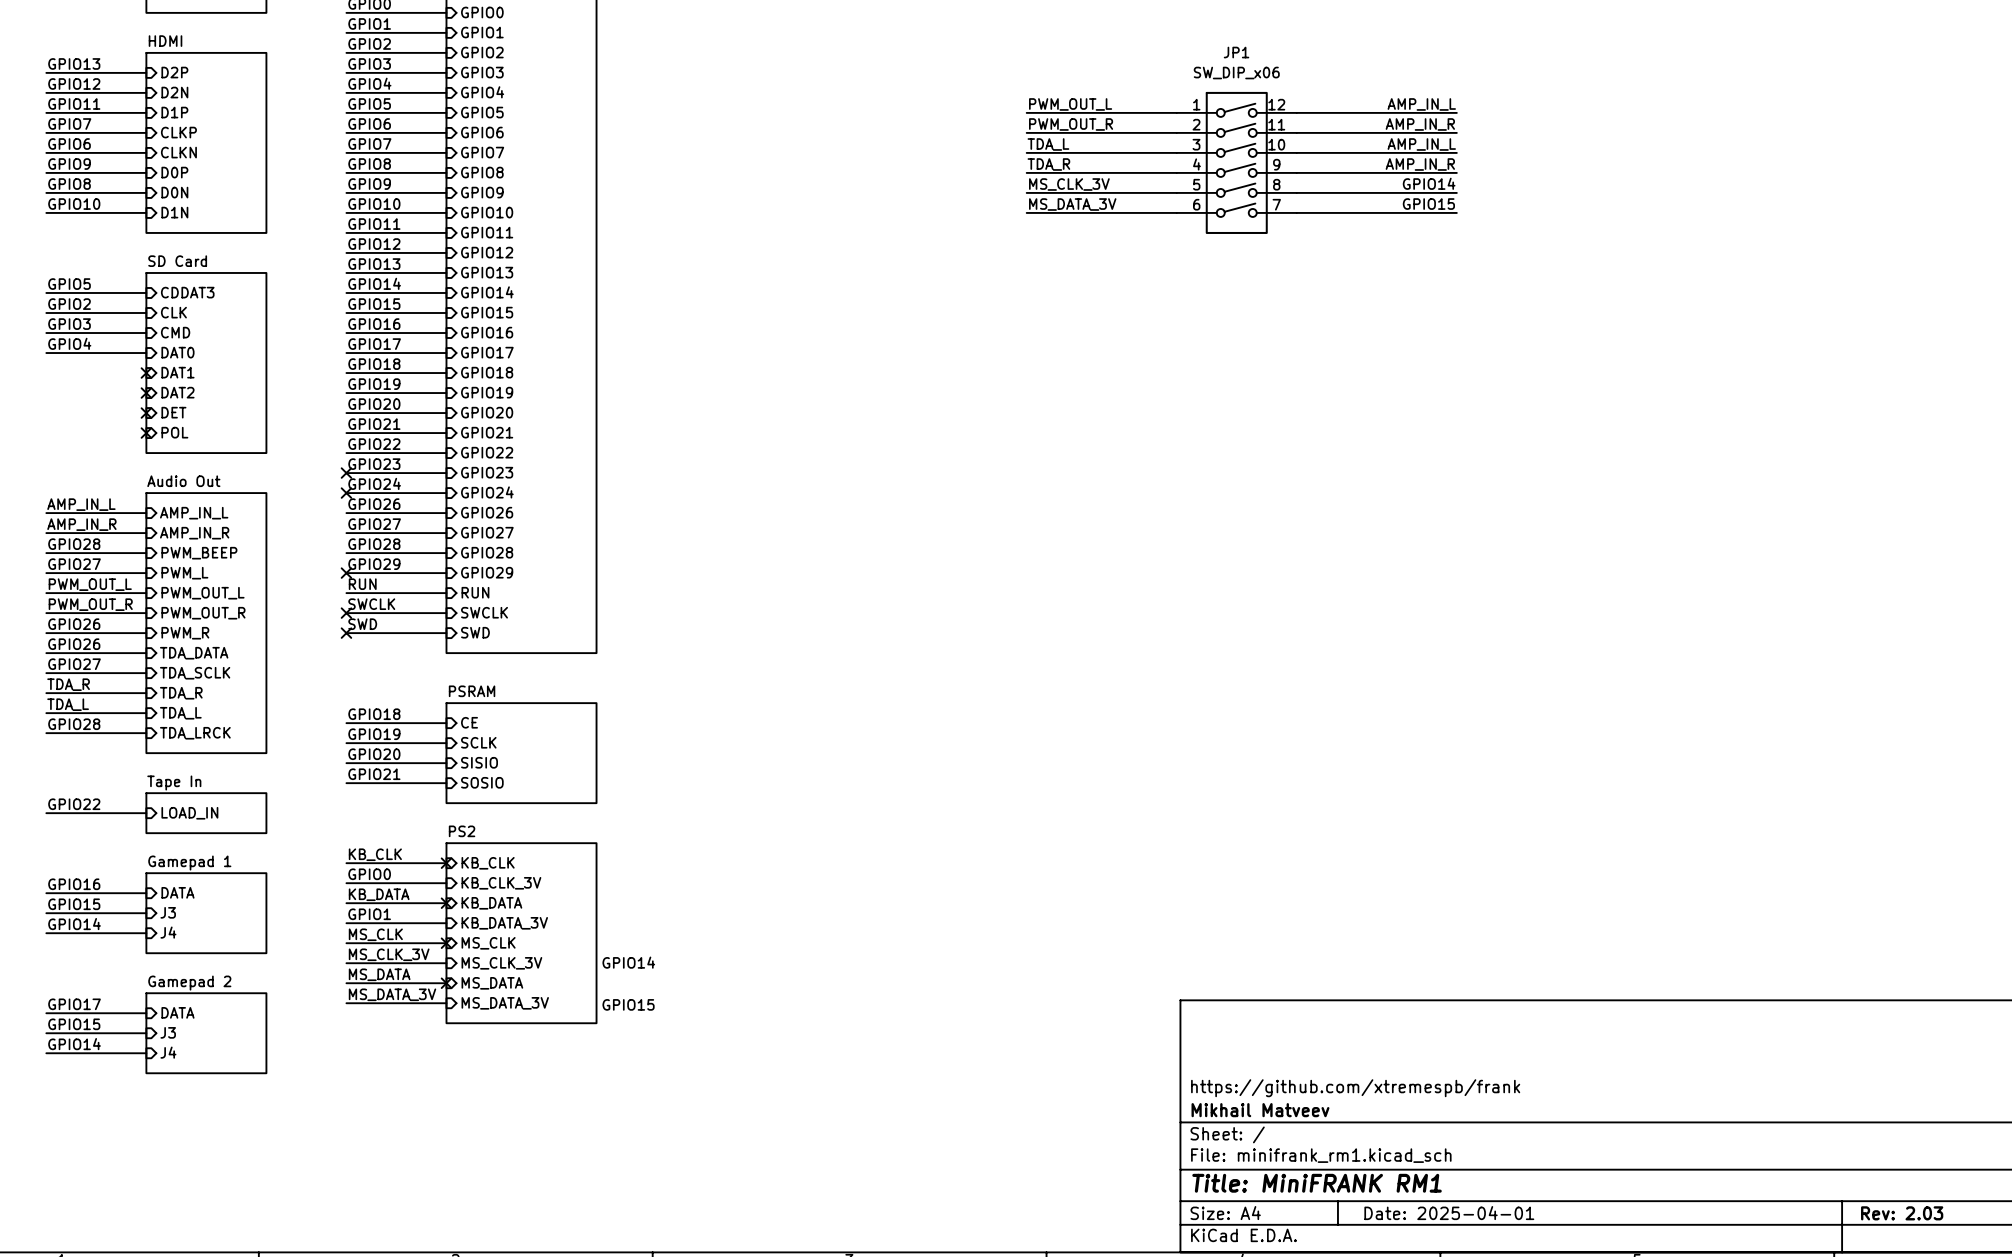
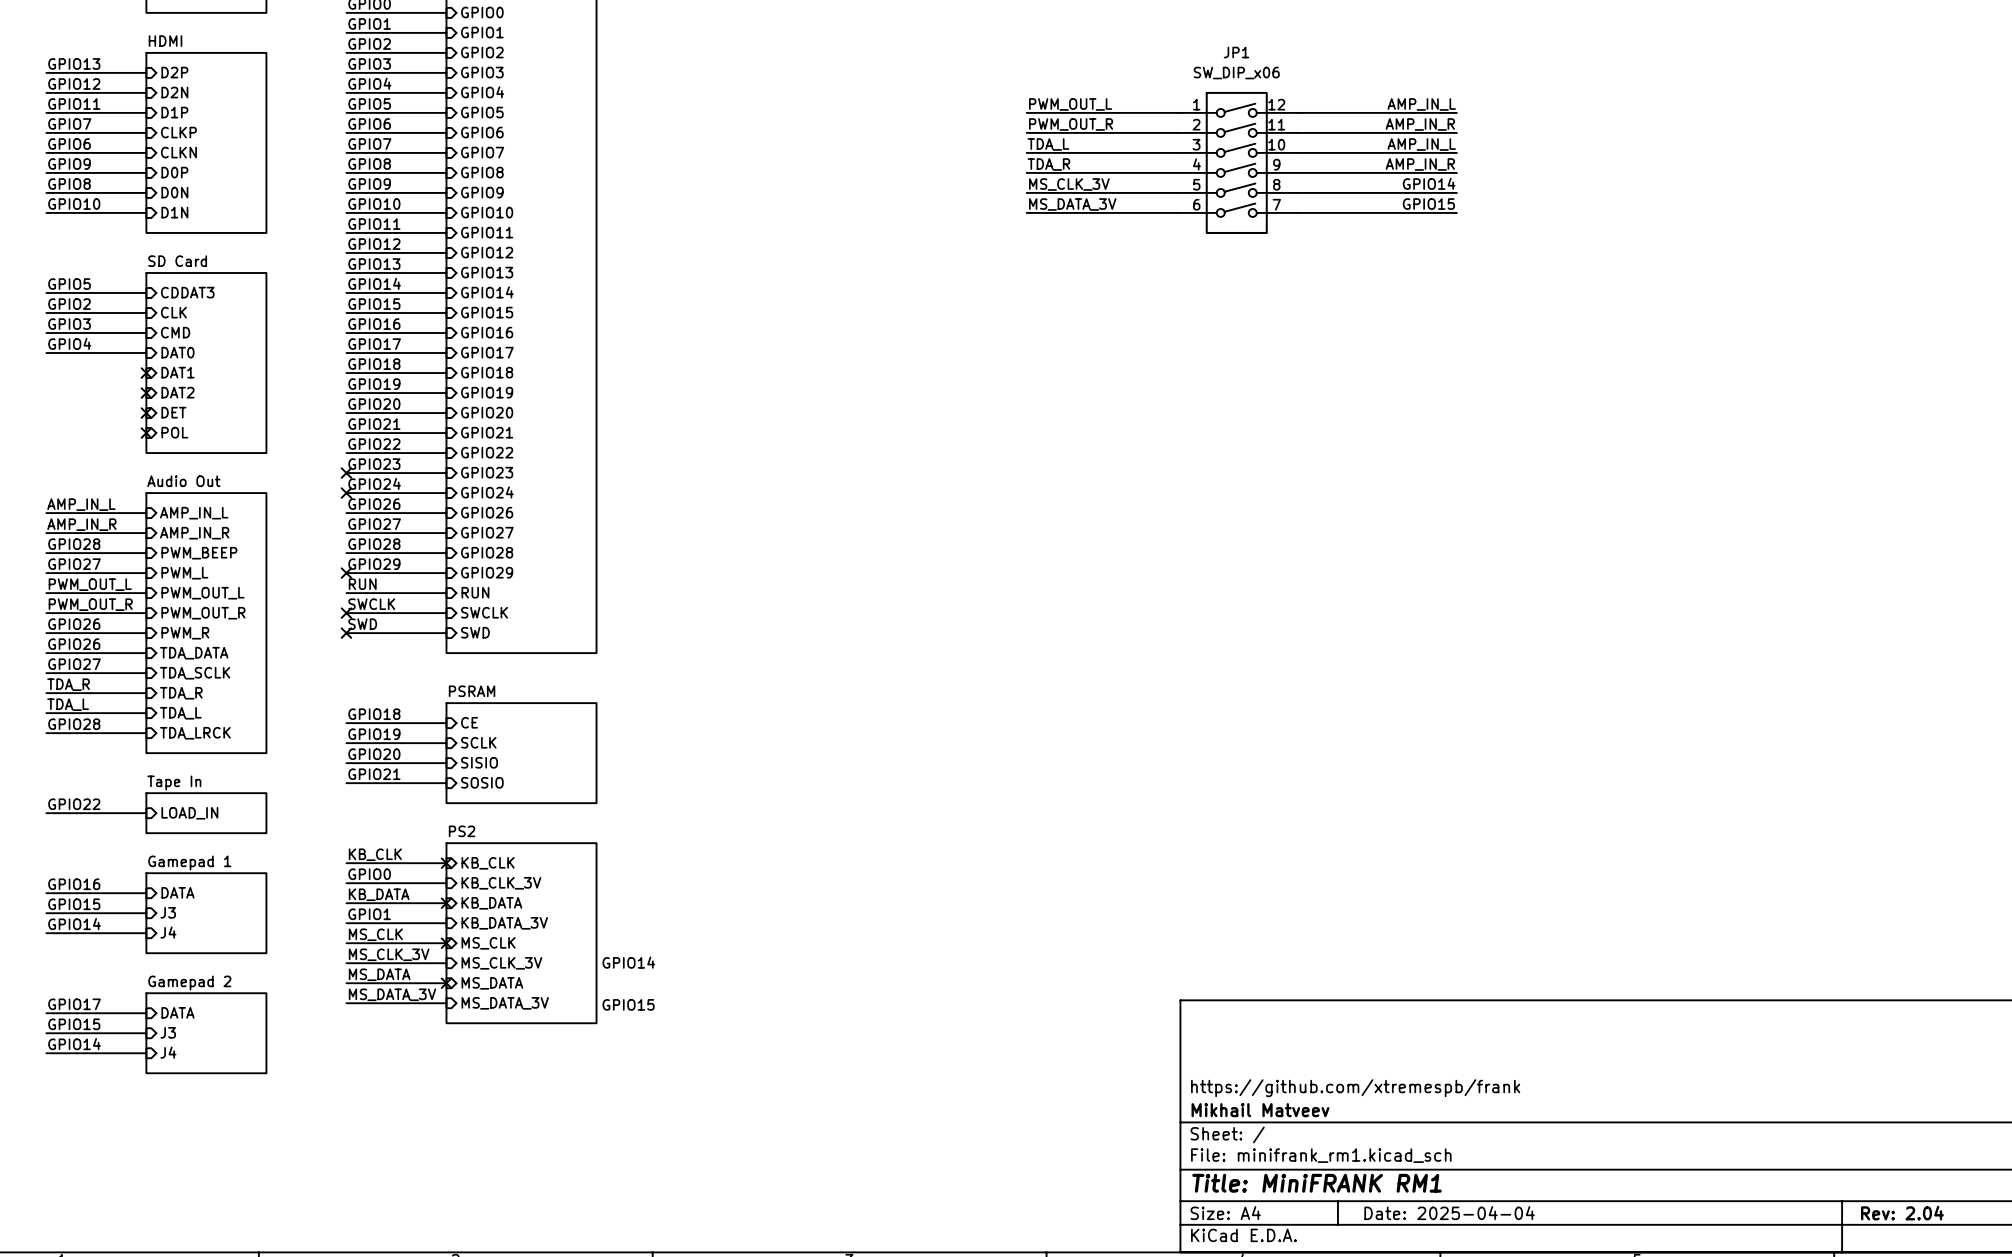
title block: Date: 2025-04-01 (1449, 1213) -> Date: 2025-04-04 (1449, 1213)
title block: Rev: 2.03 (1902, 1213) -> Rev: 2.04 (1902, 1213)

